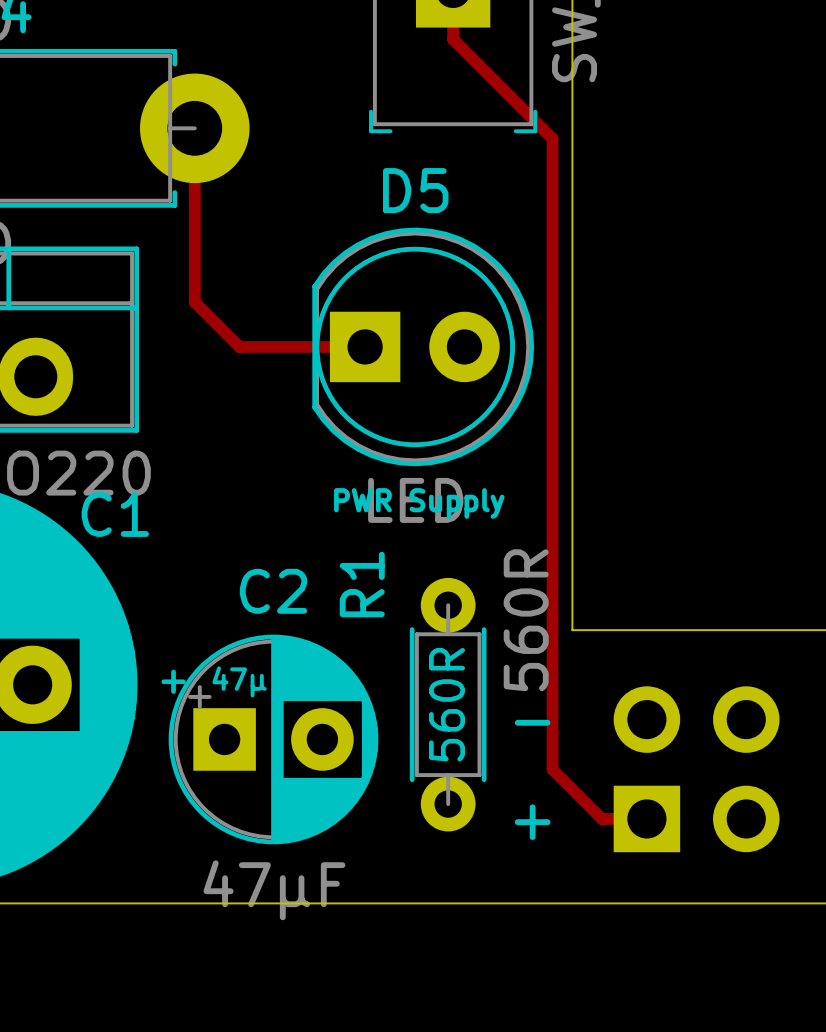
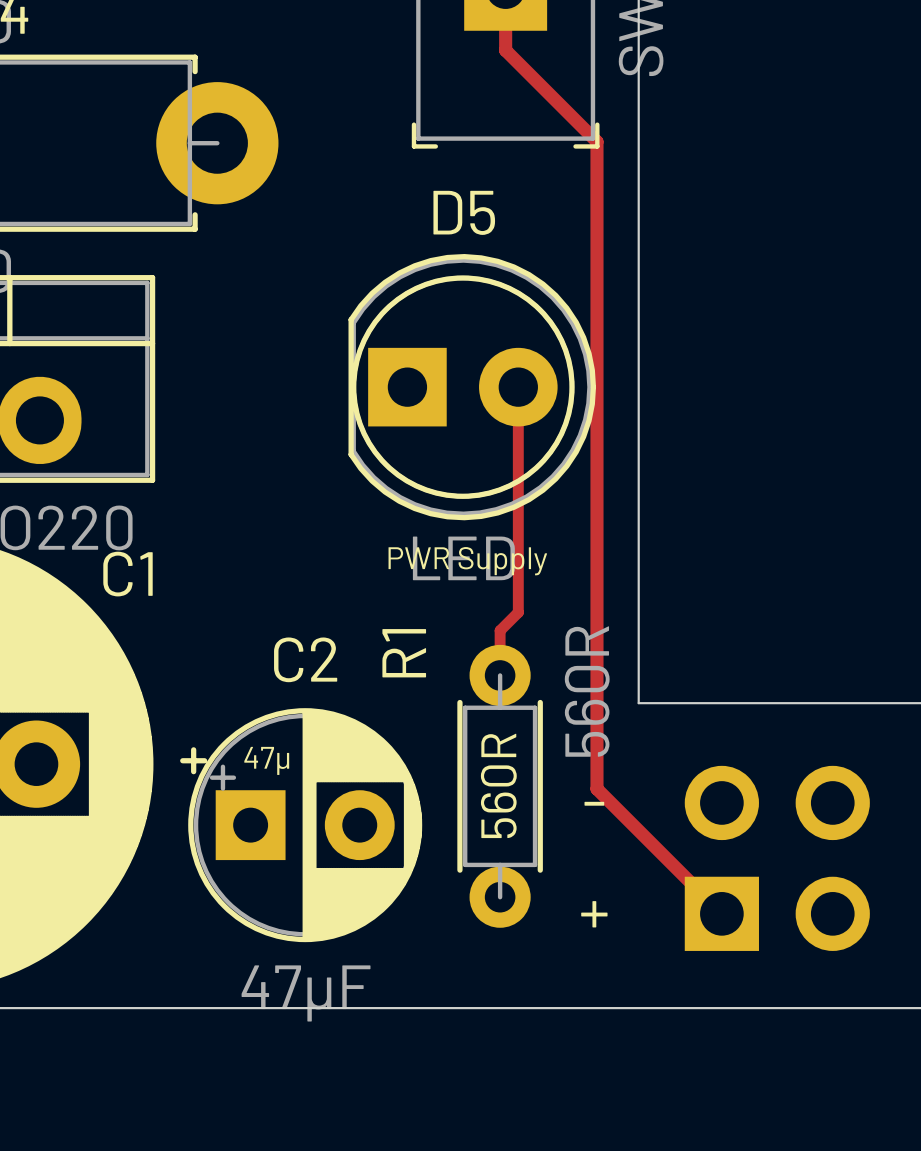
track: (453, 39) (552, 138) (552, 769) (601, 818) (646, 818) -> (505, 43) (505, 50) (596, 141) (596, 788) (721, 913)
track: (194, 128) (194, 302) (239, 346) (365, 346) -> none
track: none -> (518, 387) (518, 612) (500, 630) (500, 675)

